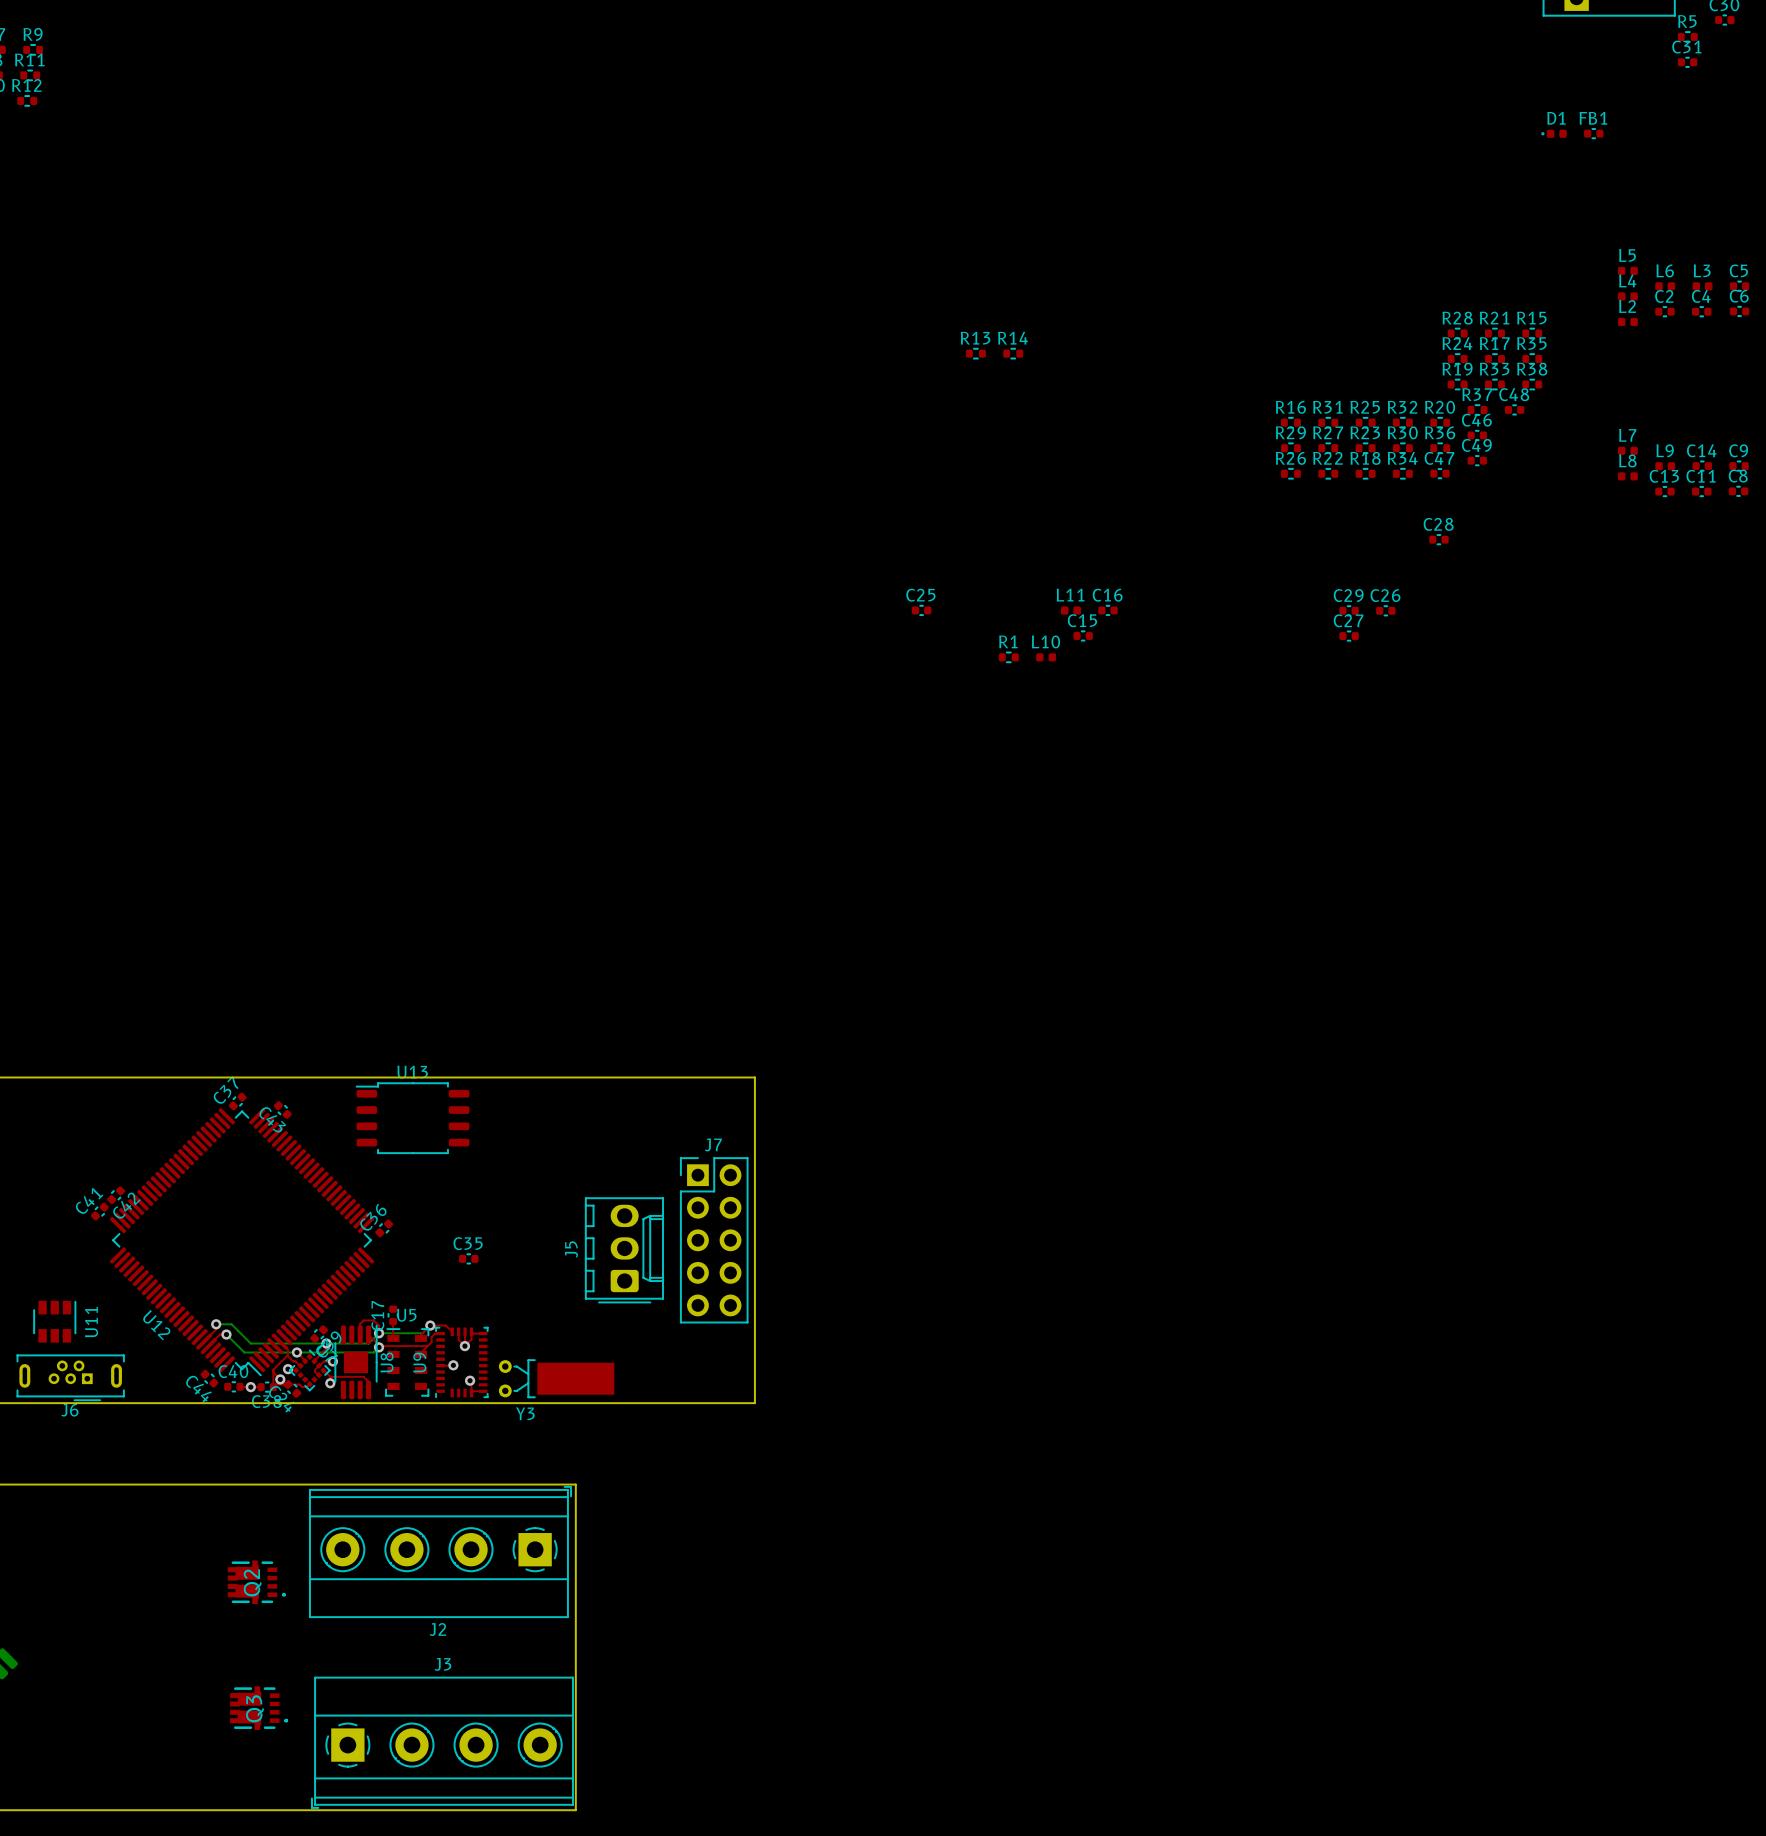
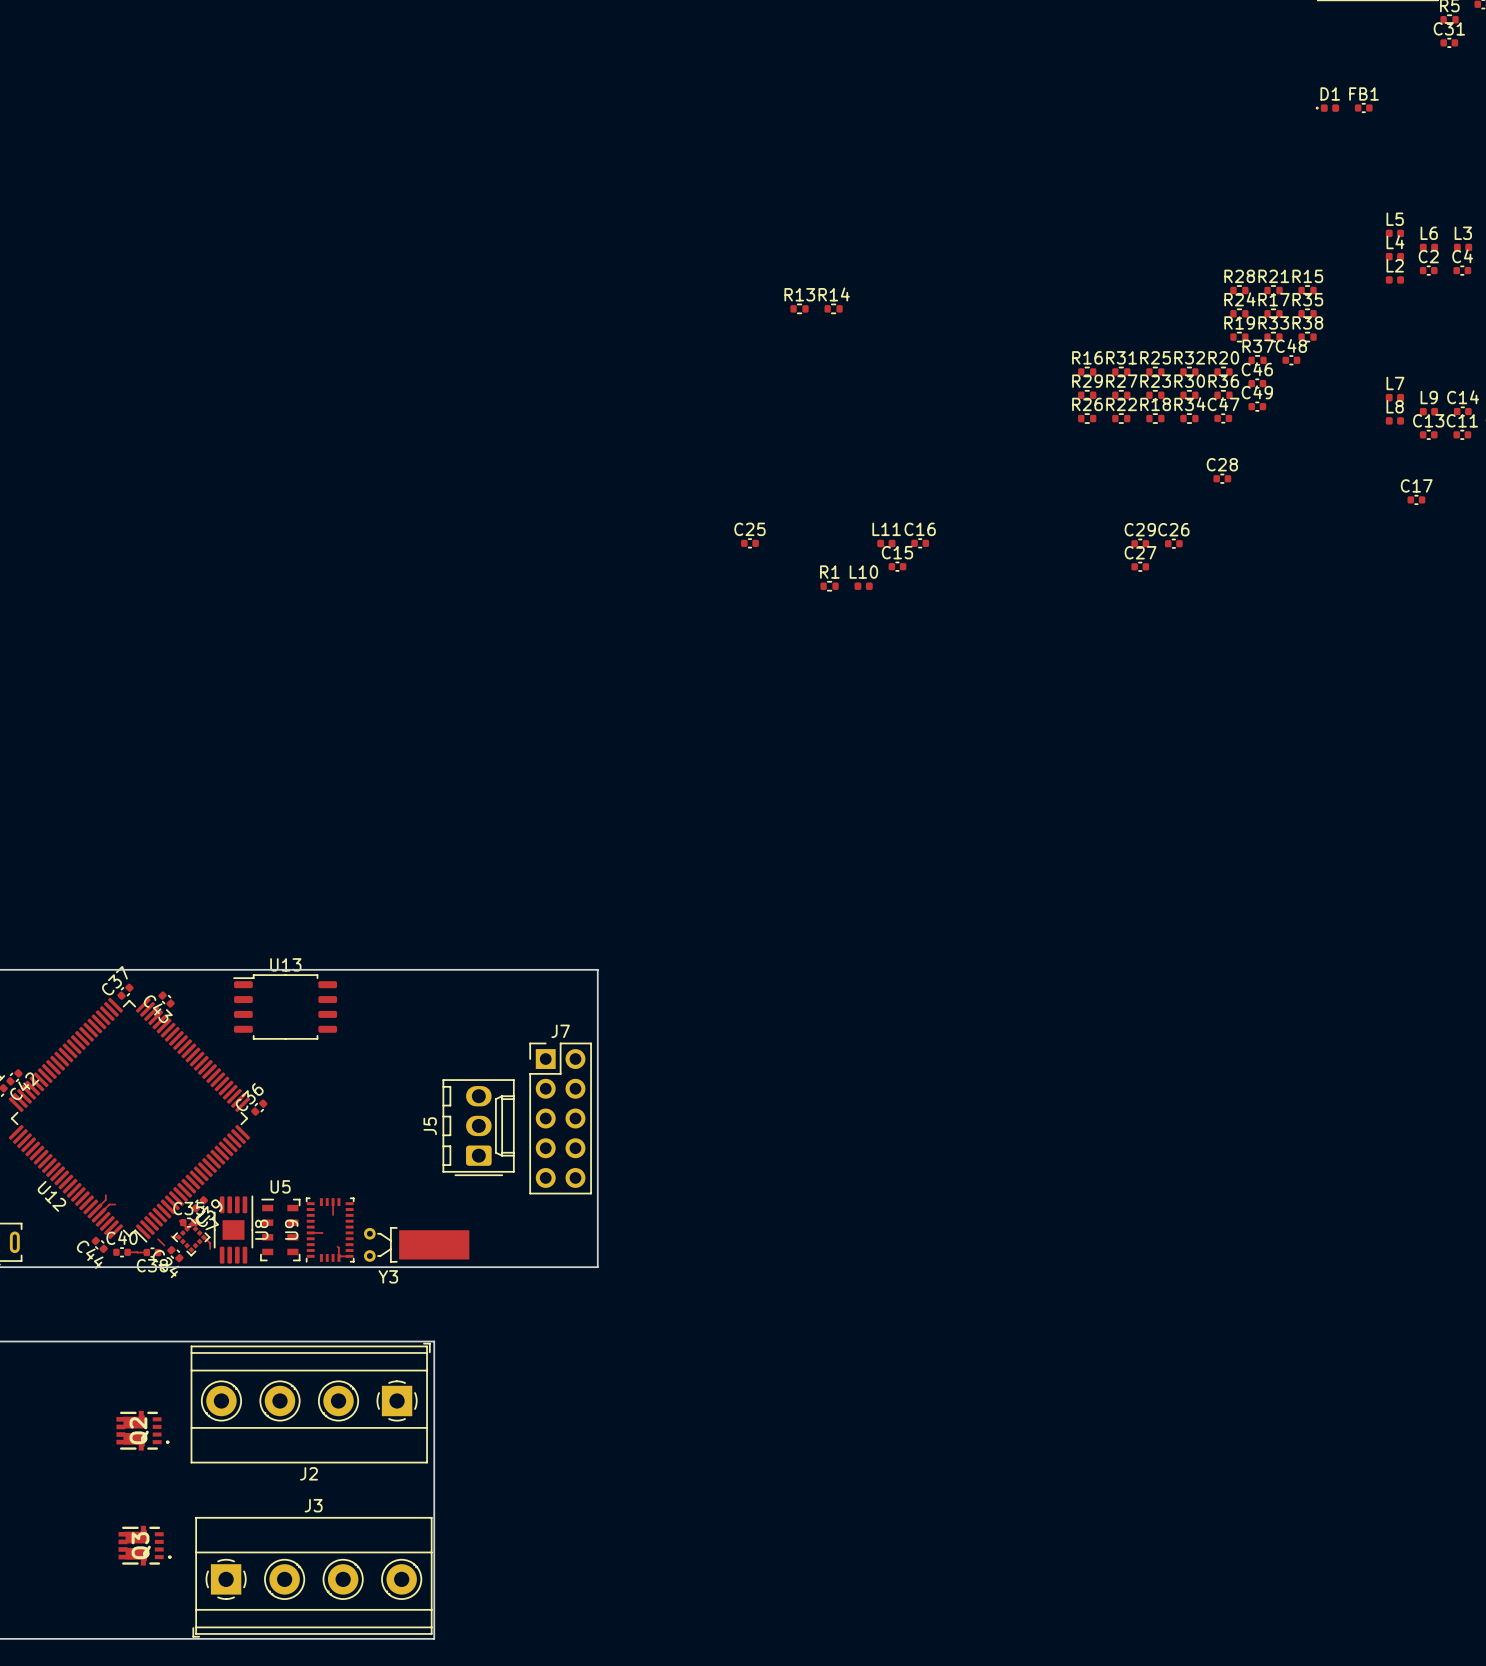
C35 position: (468, 1258) -> (188, 1222)
C17 rotation: 0° (393, 1315) -> 90° clockwise (1416, 499)
C17 position: (393, 1315) -> (1416, 499)
top track: (393, 1321) (393, 1338) -> none
bottom track: (216, 1324) (231, 1324) (250, 1343) (368, 1343) (379, 1333) (422, 1333) (430, 1325) -> none
via: (216, 1324) -> none
via: (430, 1325) -> none
top track: (452, 1331) (445, 1325) (430, 1325) (421, 1334) (421, 1338) -> none
top track: (458, 1331) (458, 1339) (464, 1346) (471, 1339) (471, 1331) (483, 1333) -> none
via: (379, 1333) -> none
top track: (380, 1333) (379, 1325) (373, 1320) (363, 1320) (360, 1323) (360, 1334) -> none
top track: (440, 1333) (435, 1333) (431, 1337) (431, 1342) (421, 1354) -> none
bottom track: (226, 1334) (244, 1352) (373, 1352) (379, 1347) -> none
via: (226, 1334) -> none
top track: (368, 1334) (379, 1347) (427, 1346) -> none
top track: (279, 1341) (287, 1349) (287, 1355) (273, 1369) (273, 1387) (275, 1384) (299, 1384) (302, 1387) (306, 1387) (309, 1384) -> none
top track: (326, 1343) (326, 1348) (314, 1361) -> none
via: (326, 1343) -> none
via: (464, 1346) -> none
via: (379, 1347) -> none
via: (296, 1352) -> none
top track: (287, 1355) (300, 1365) -> none
top track: (332, 1361) (323, 1361) (318, 1365) (314, 1369) (318, 1375) -> none
via: (332, 1361) -> none
via: (453, 1365) -> none
via: (287, 1369) -> none
top track: (330, 1376) (363, 1376) (368, 1381) (368, 1390) -> none
via: (280, 1379) -> none
via: (470, 1380) -> none
via: (330, 1383) -> none
via: (250, 1387) -> none

